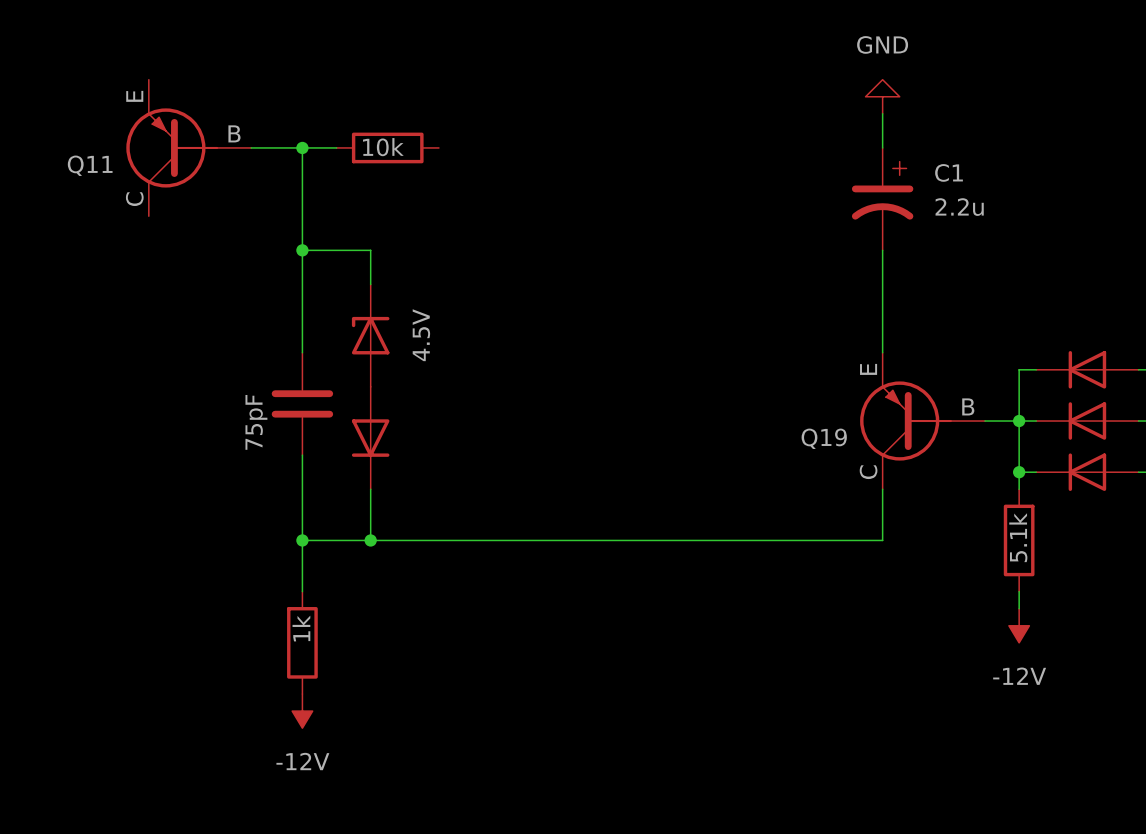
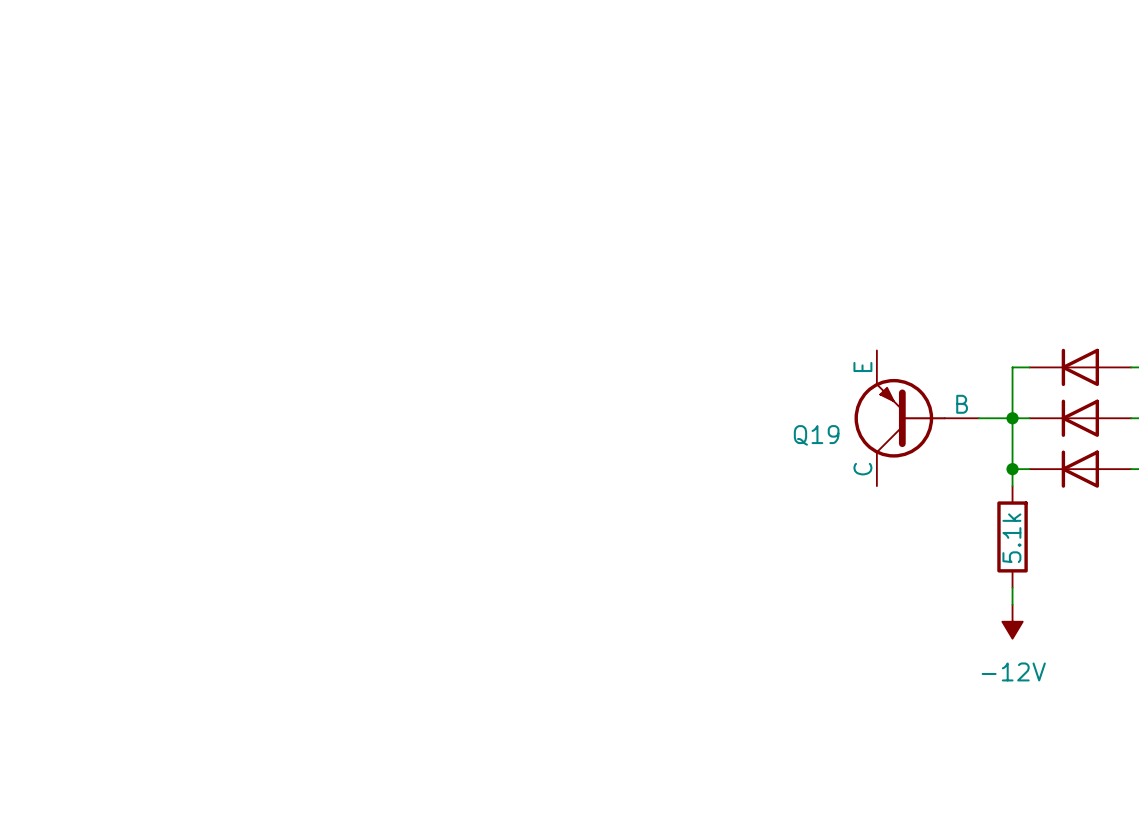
power symbol: GND (882, 96) -> none
wire: (882, 113) (882, 147) -> none
Q11: (188, 147) -> none
wire: (251, 147) (336, 147) -> none
wire: (302, 147) (302, 352) -> none
junction: (302, 147) -> none
part: 10k (387, 147) -> none
C1: 2.2u (882, 199) -> none
wire: (302, 250) (370, 250) (370, 284) -> none
junction: (302, 250) -> none
wire: (882, 250) (882, 352) -> none
part: 4.5V (370, 335) -> none
part: 75pF (302, 403) -> none
part: (370, 438) -> none
wire: (302, 455) (302, 591) -> none
wire: (370, 489) (370, 540) -> none
wire: (882, 489) (882, 540) (302, 540) -> none
junction: (302, 540) -> none
junction: (370, 540) -> none
part: 1k (302, 642) -> none
power symbol: -12V (302, 711) -> none

